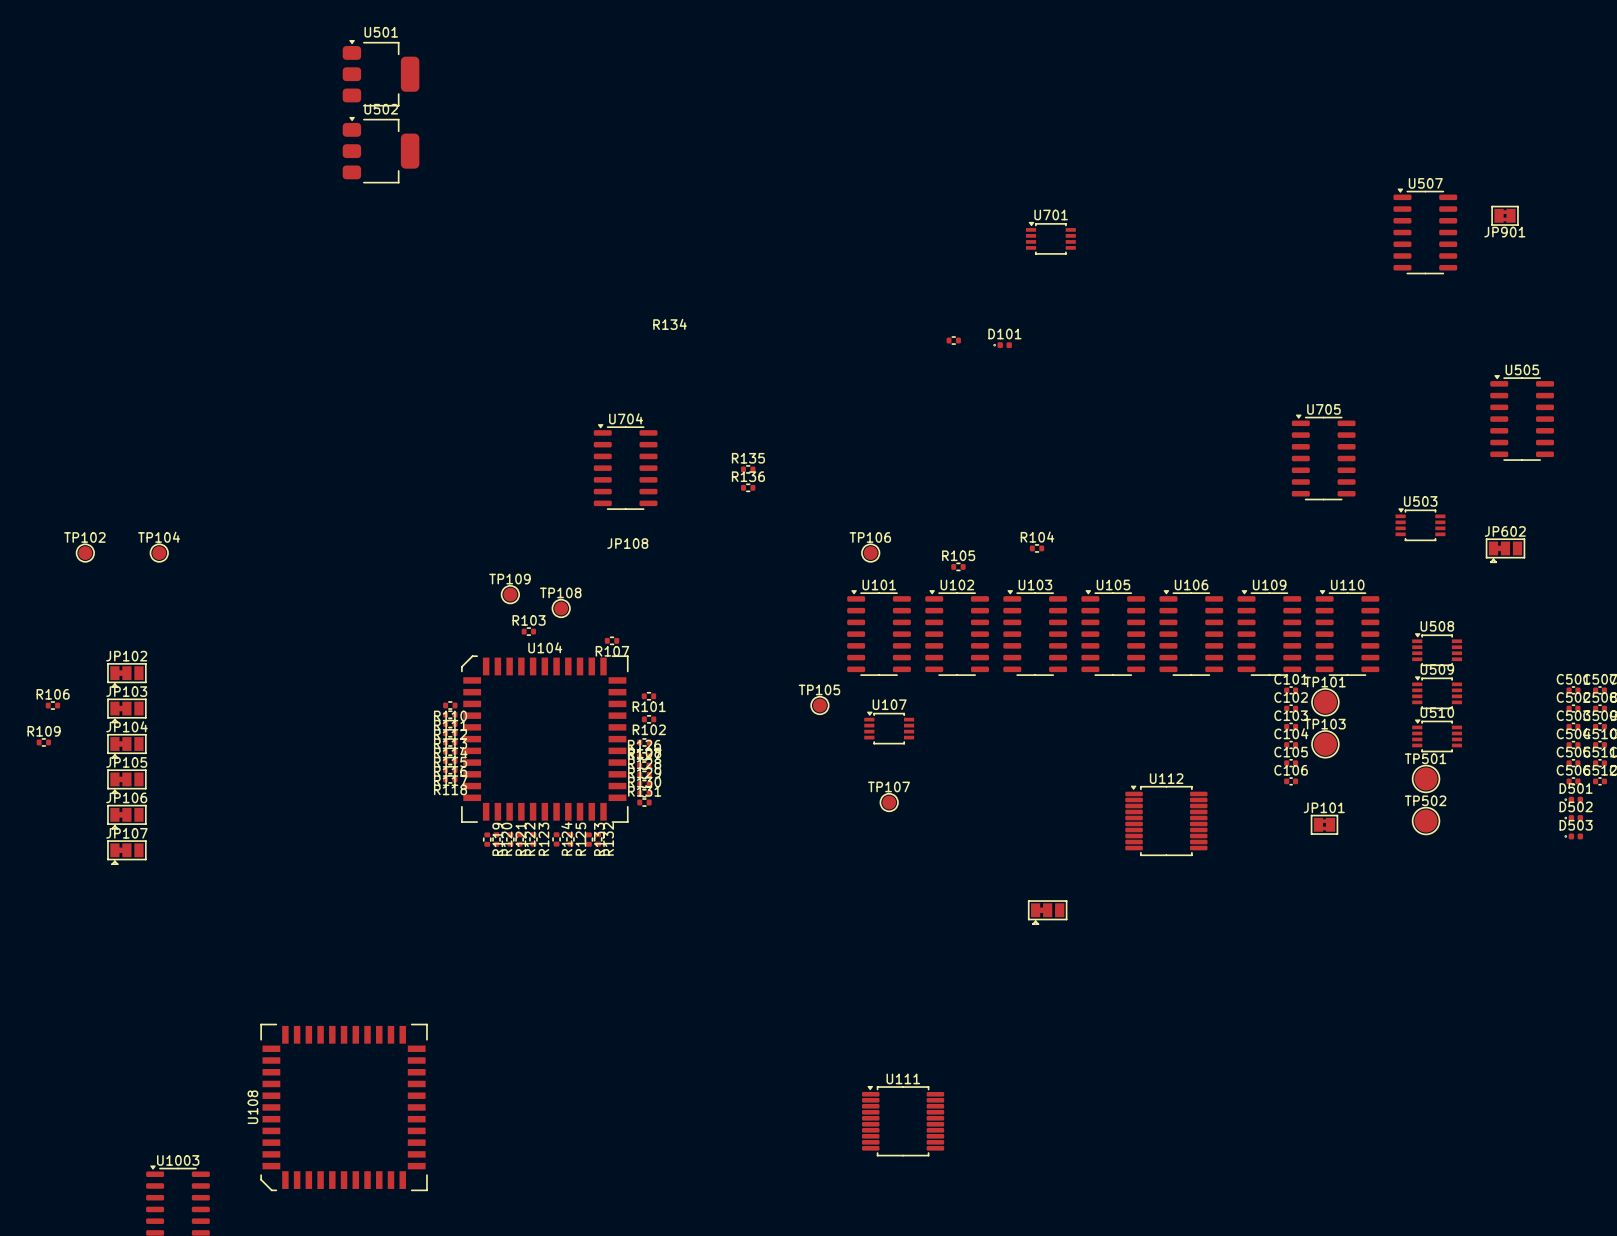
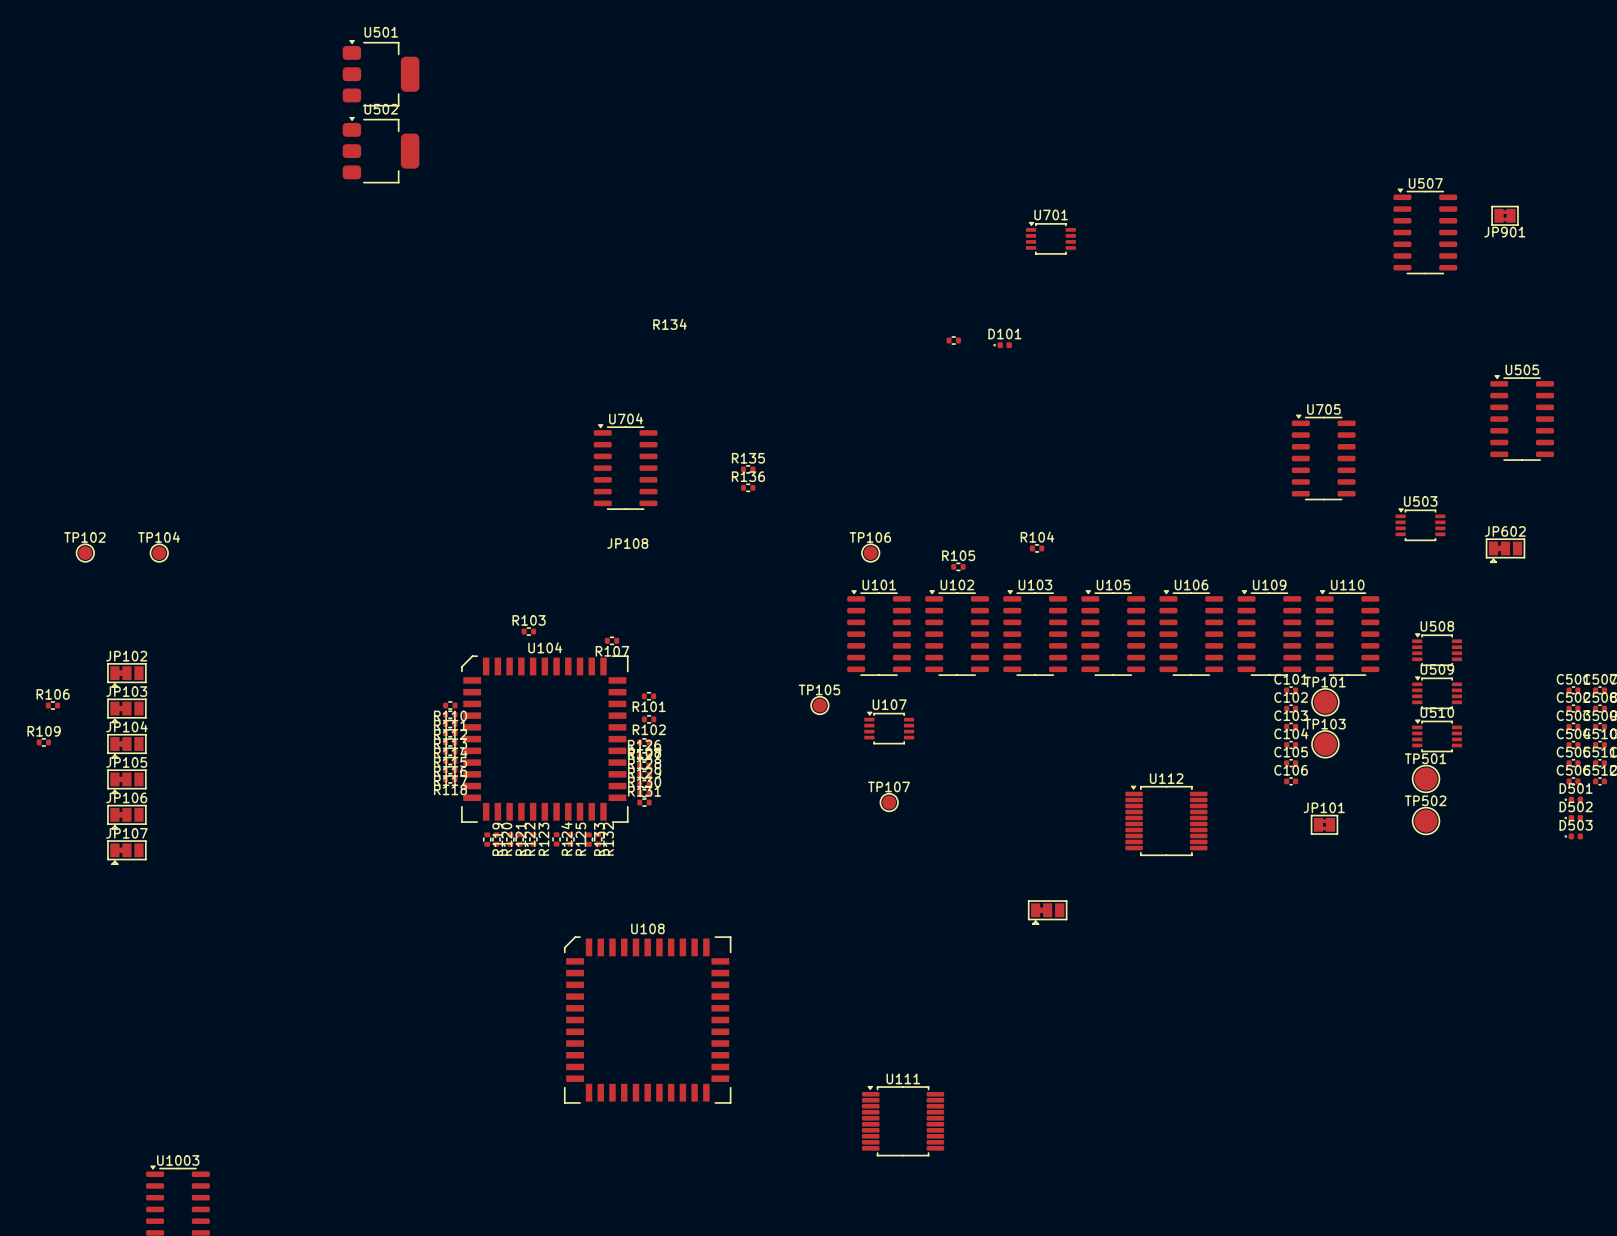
TP109: (510, 594) -> none
TP108: (561, 608) -> none
U108 rotation: 0° (344, 1107) -> 90° clockwise (647, 1020)
U108 position: (344, 1107) -> (647, 1020)

